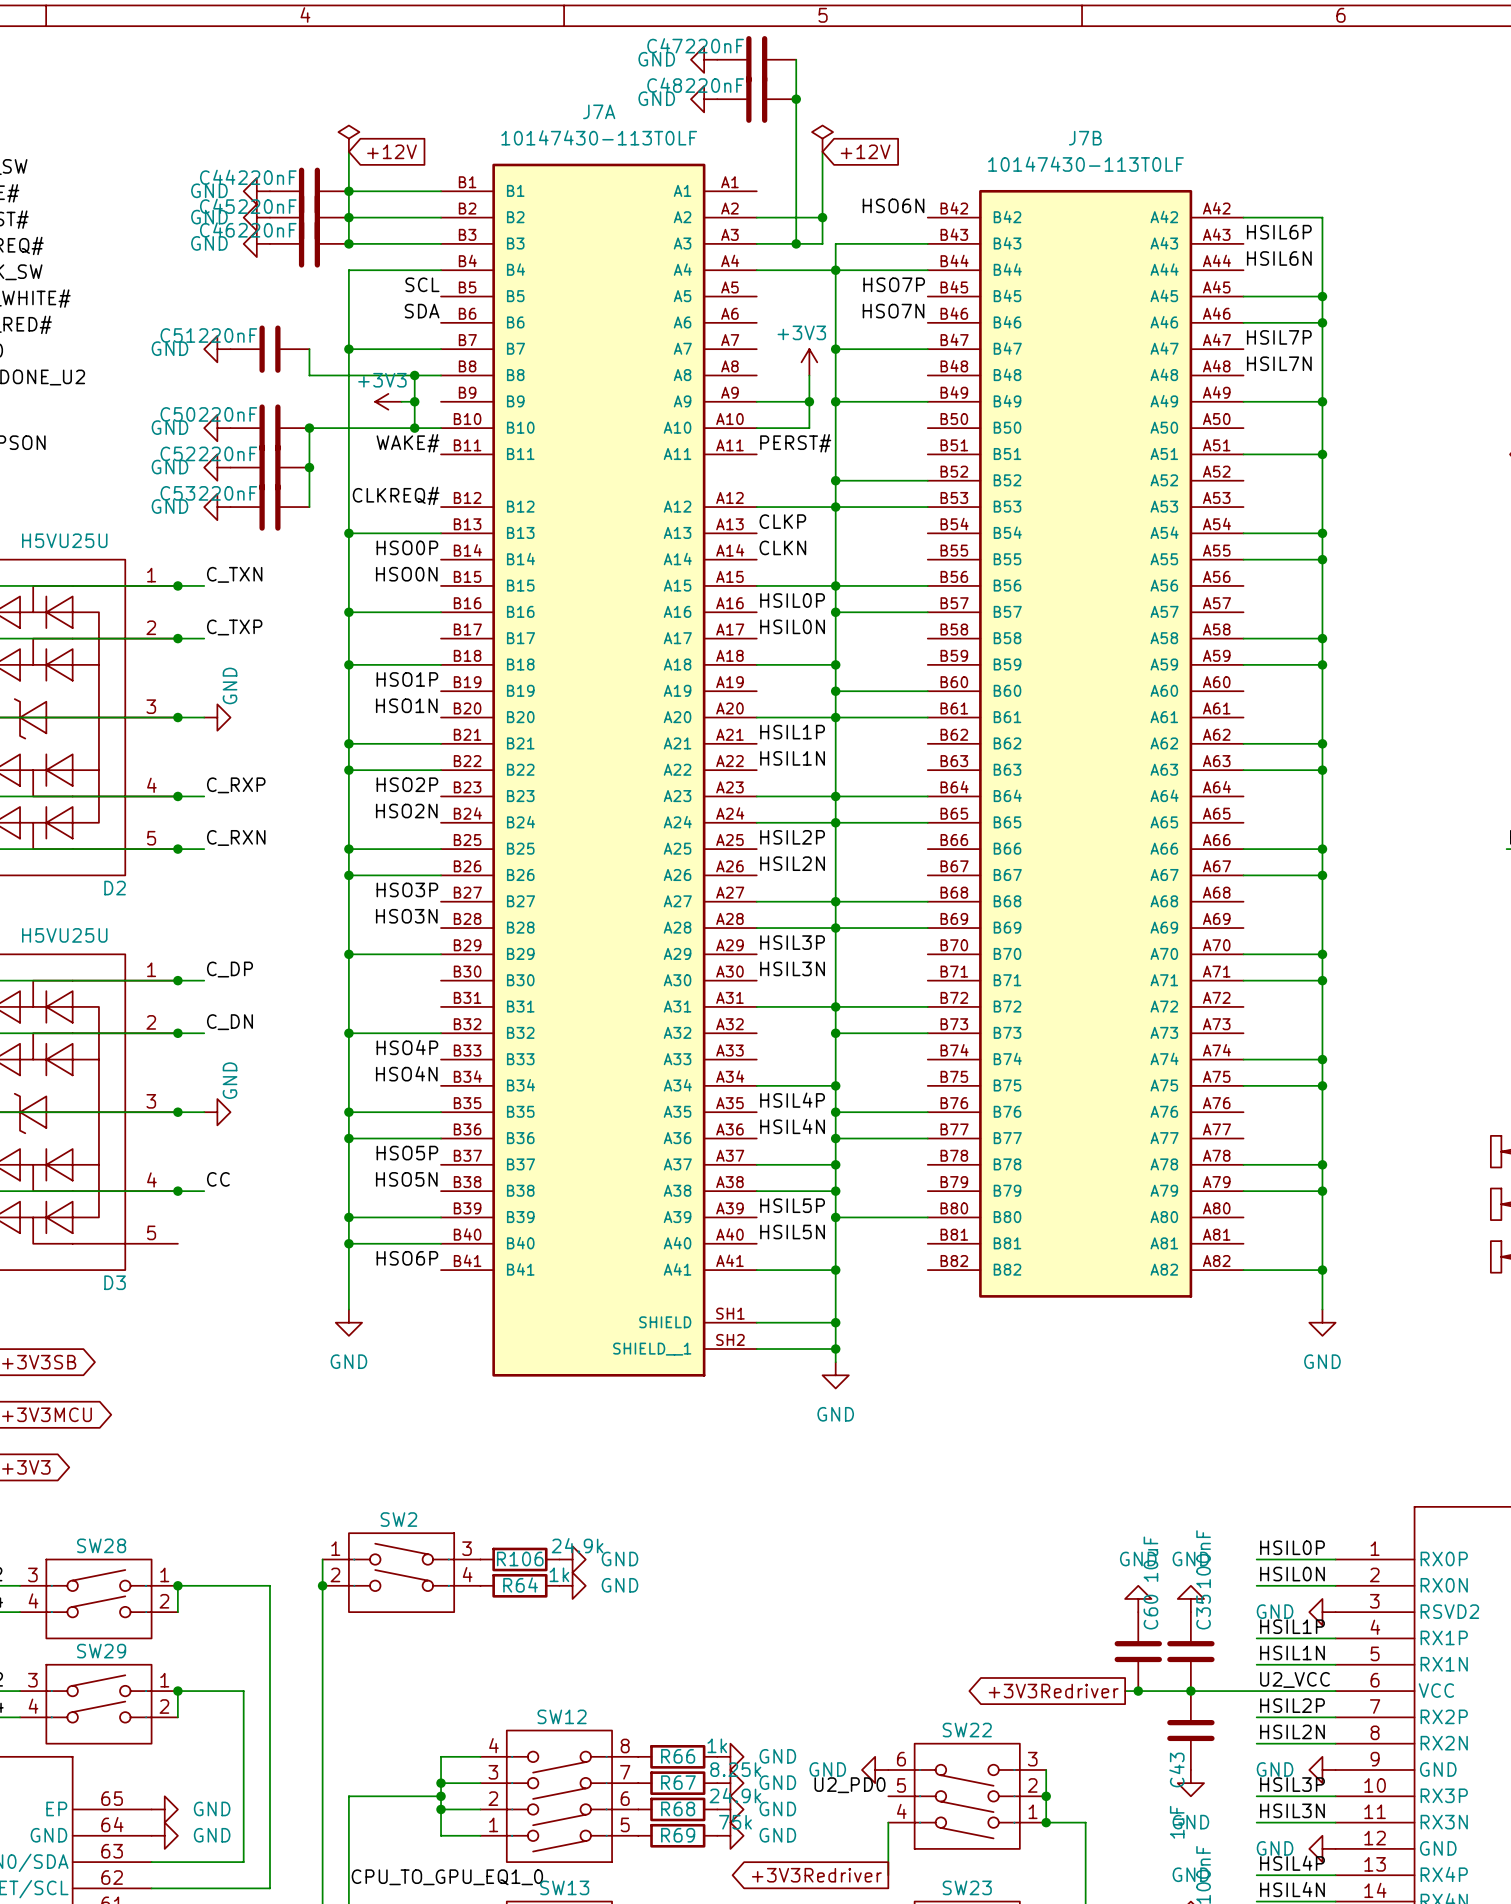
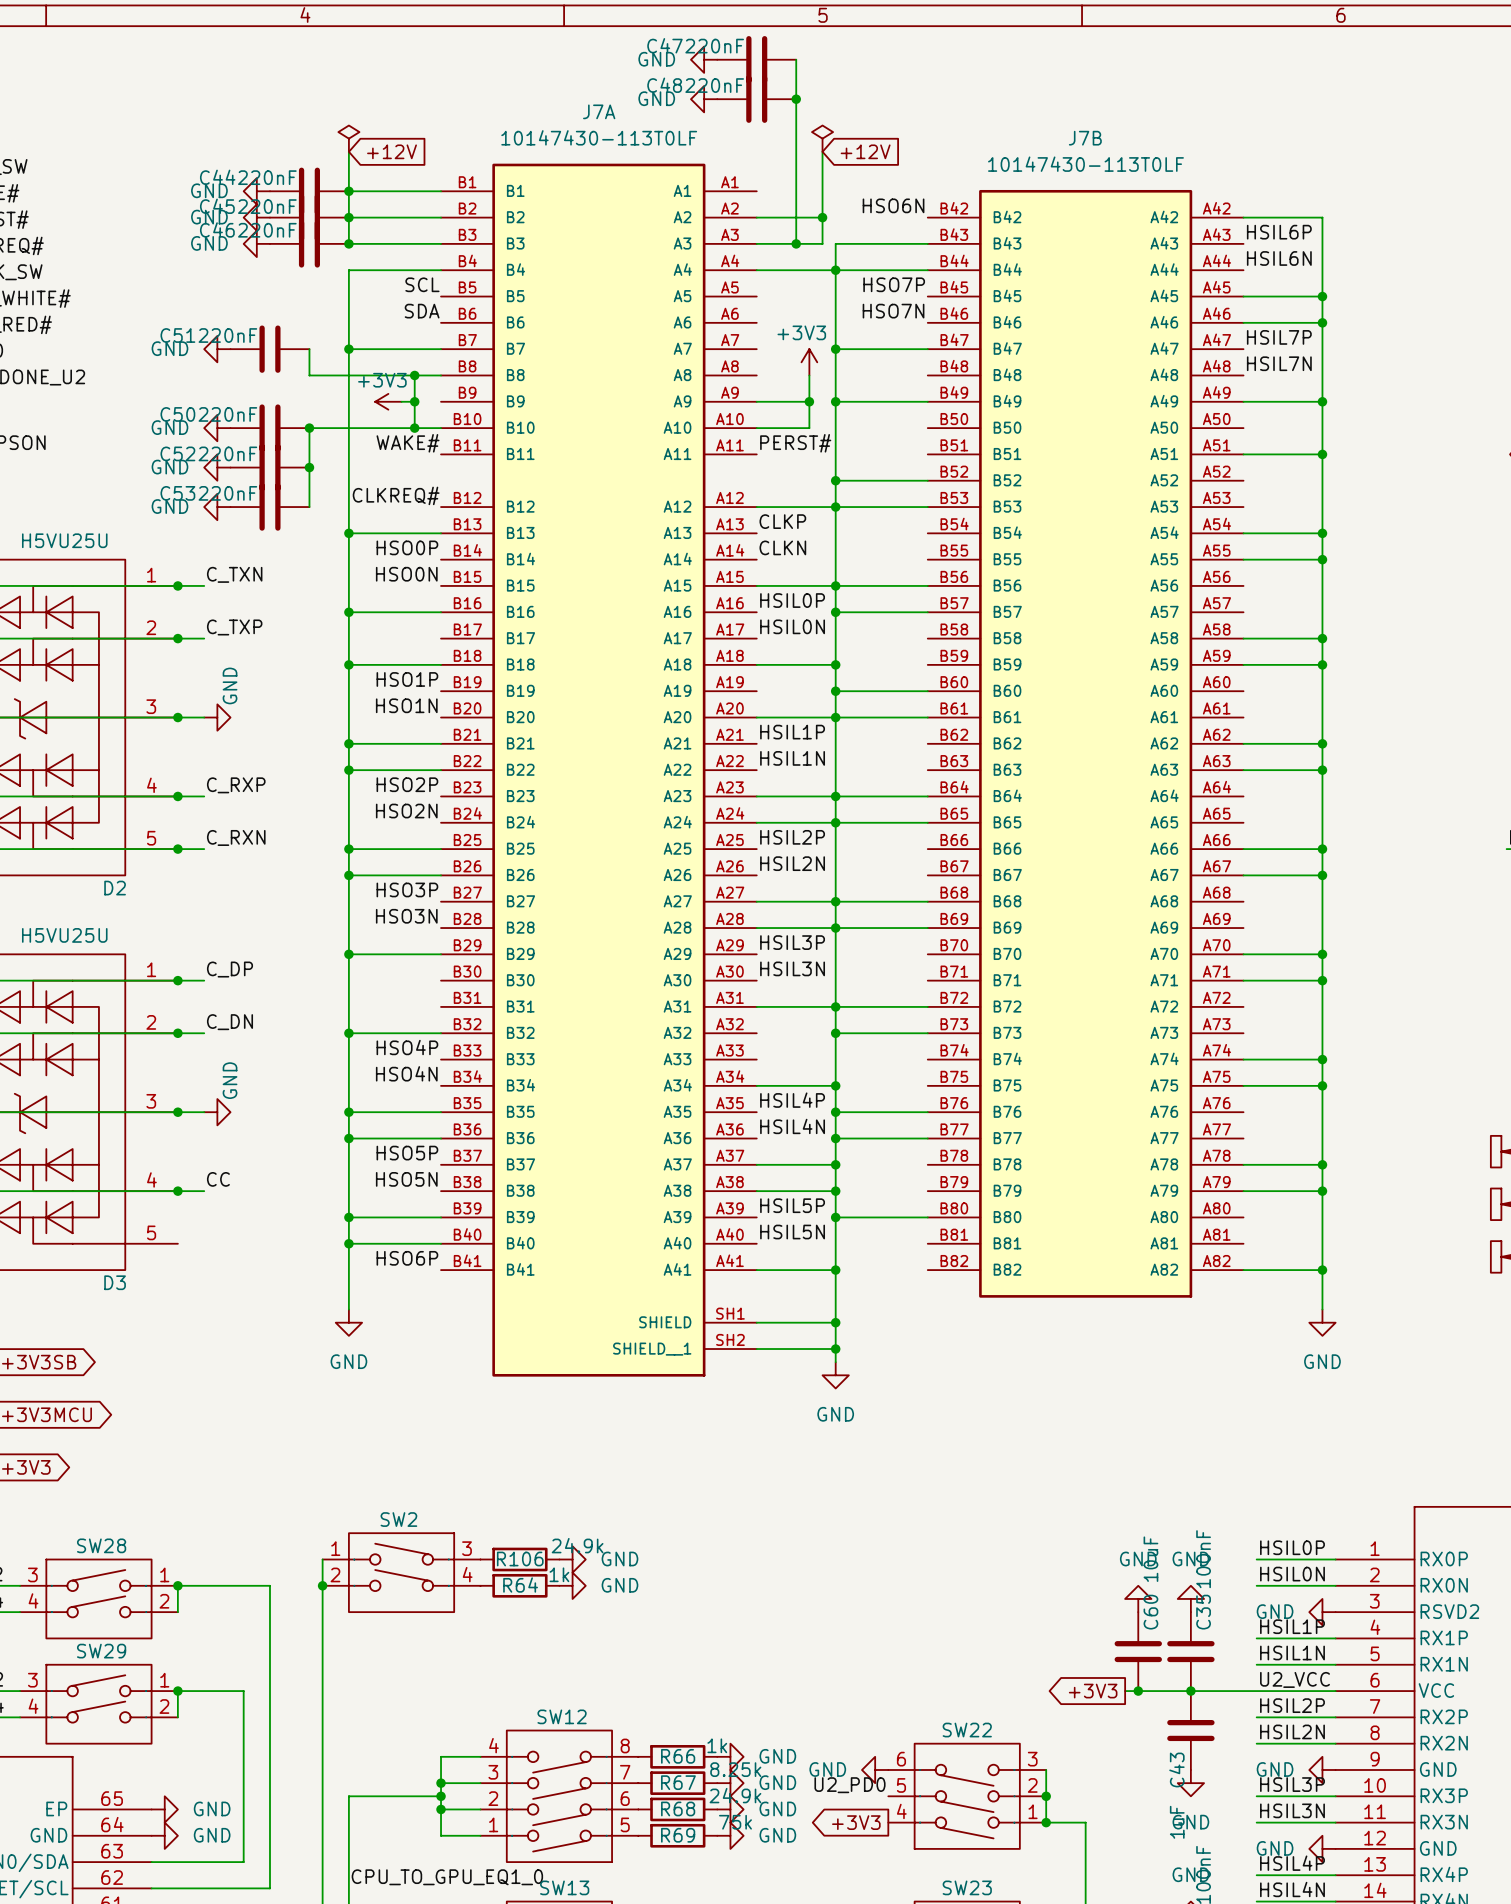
global label: +3V3Redriver (1053, 1691) -> +3V3 (1093, 1691)
global label: none -> +3V3 (856, 1822)
wire: (888, 1822) (888, 1875) -> none
global label: +3V3Redriver (816, 1875) -> none

